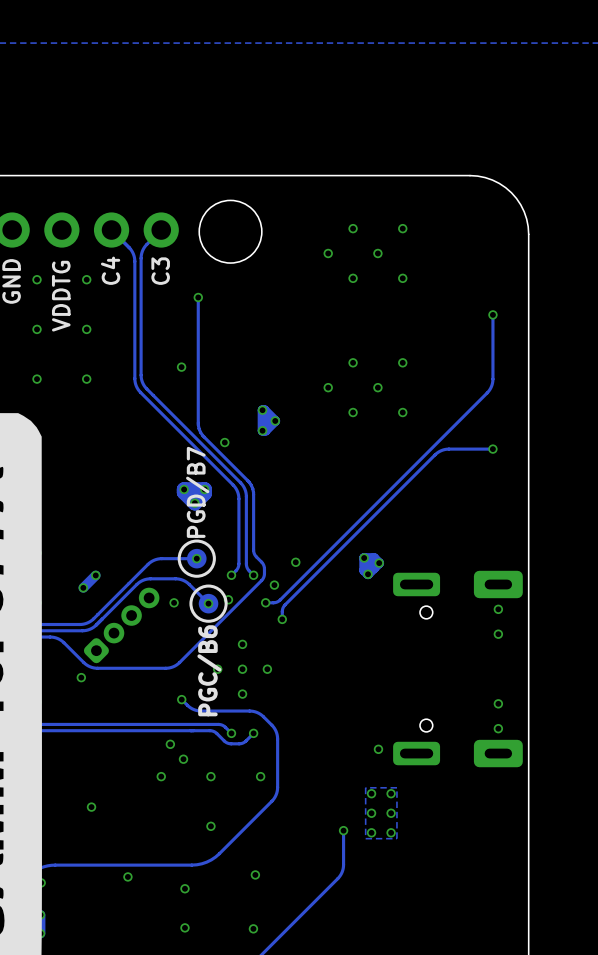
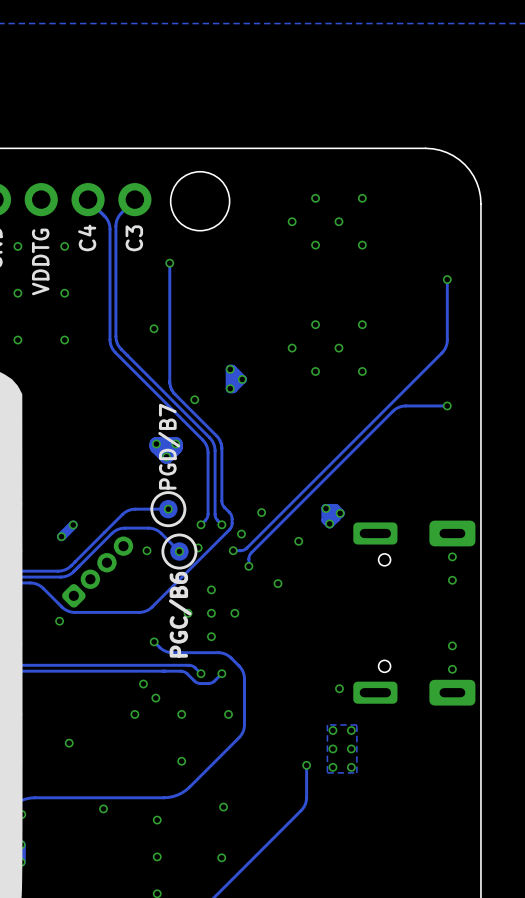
via: none -> (298, 541)
via: none -> (277, 583)

